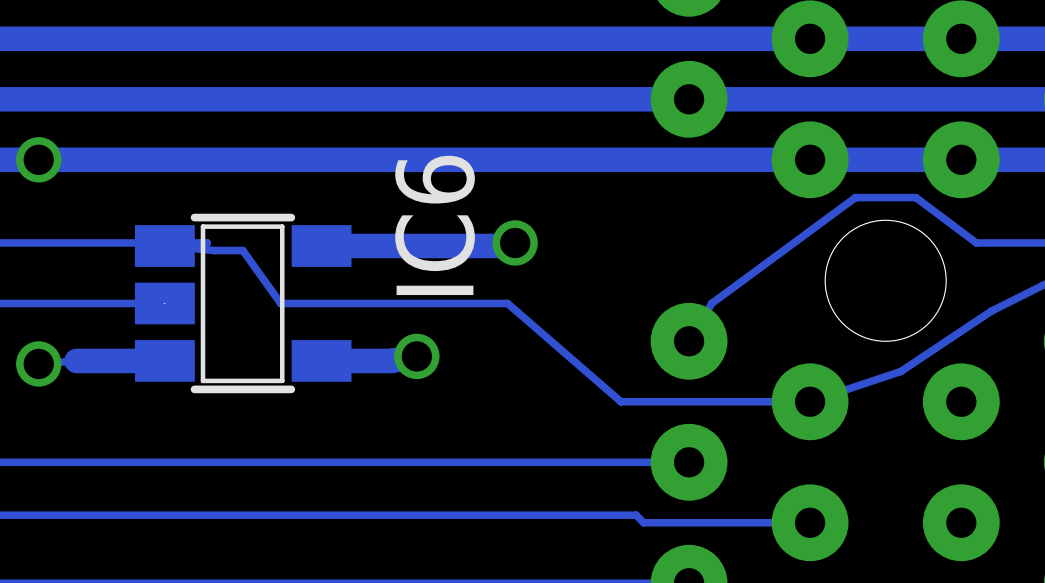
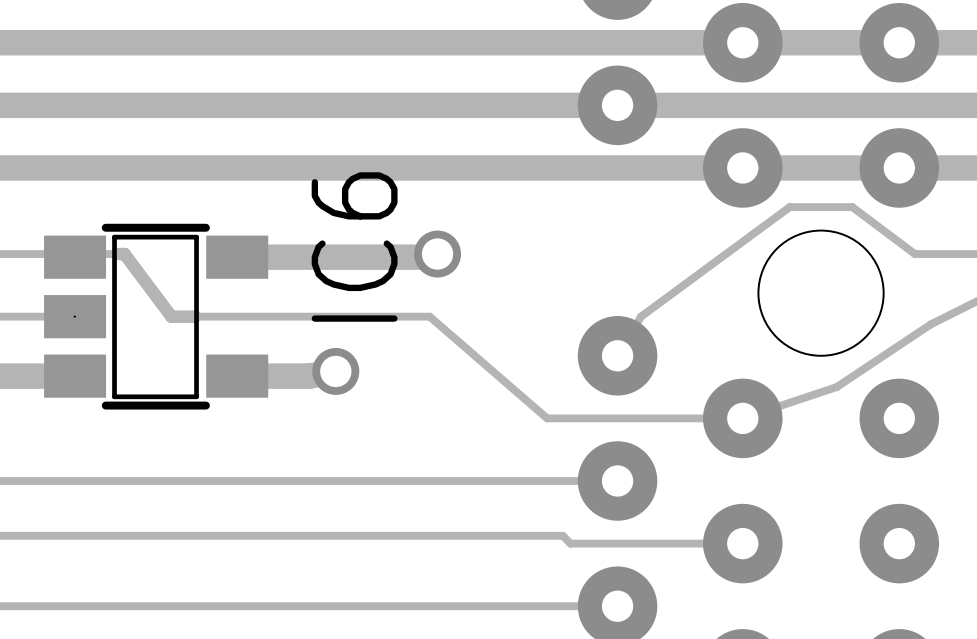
track: (207, 242) (164, 246) (214, 250) (242, 250) (280, 303) -> (118, 254) (124, 254) (171, 316) (194, 316)

